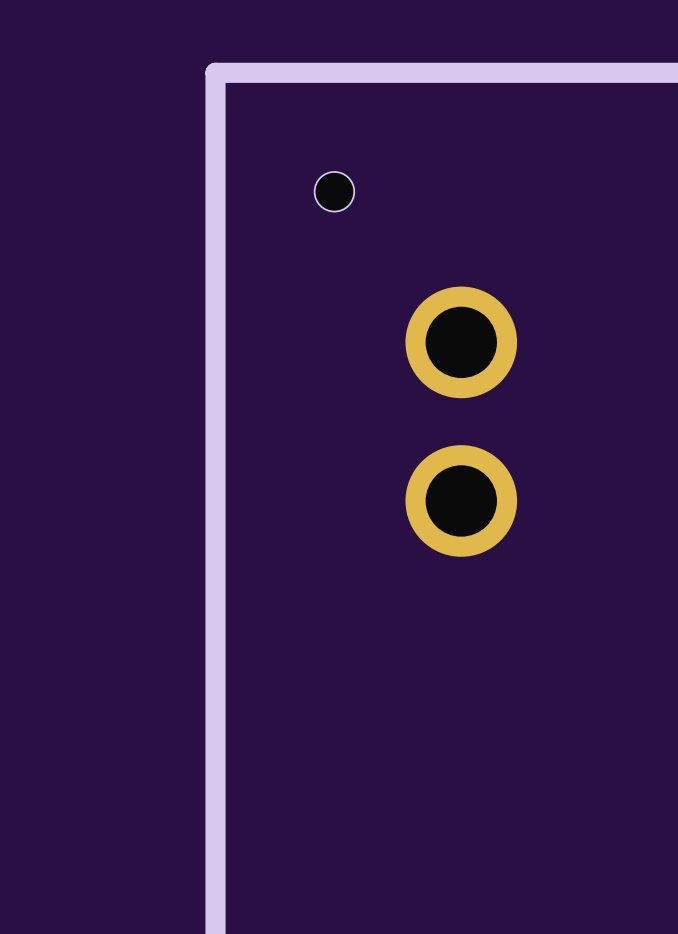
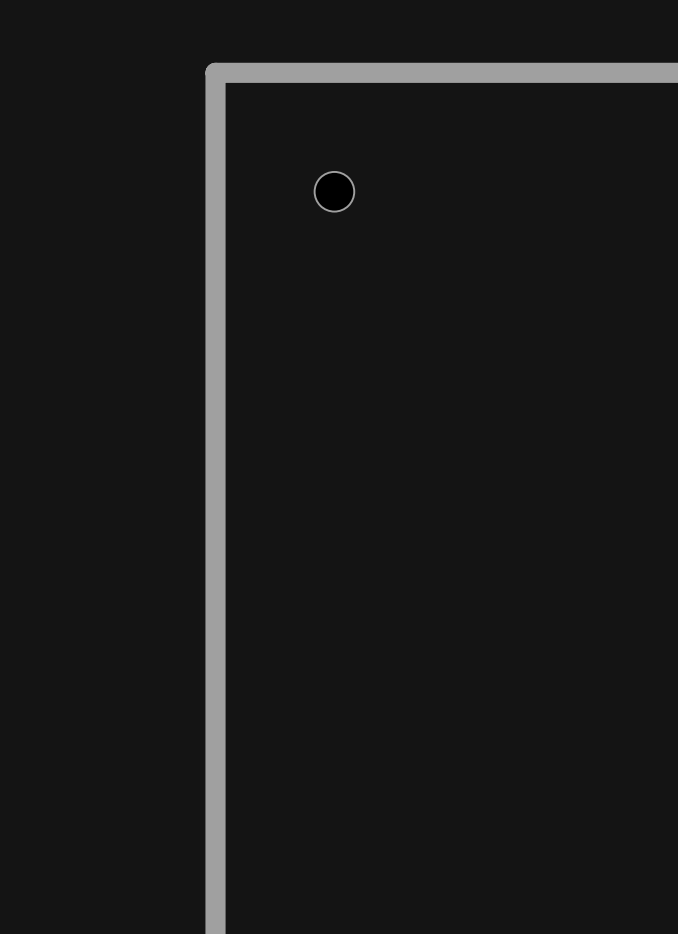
part: (461, 421) -> none

